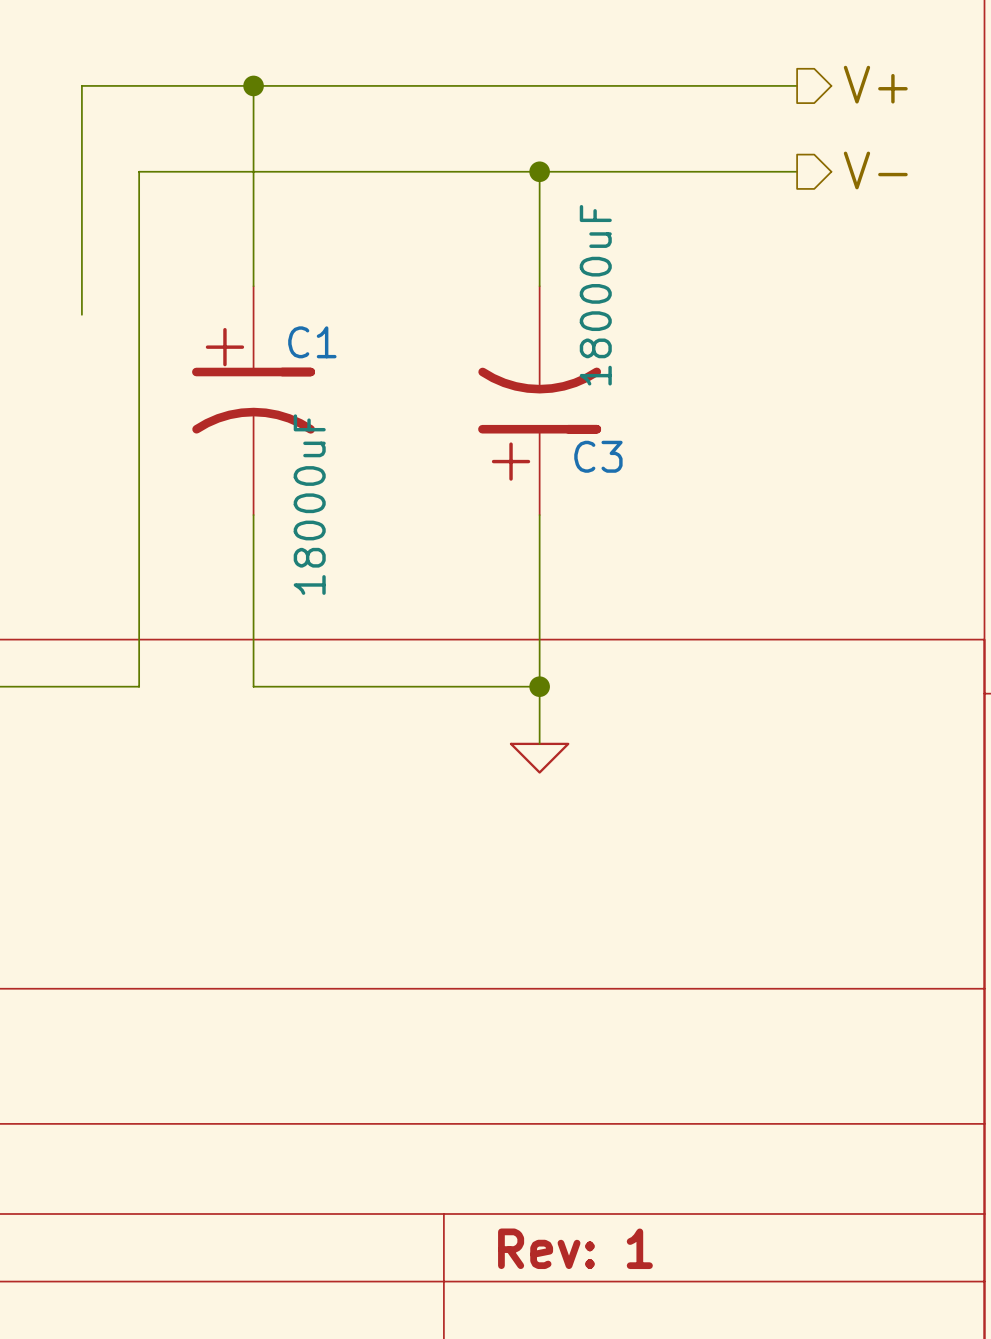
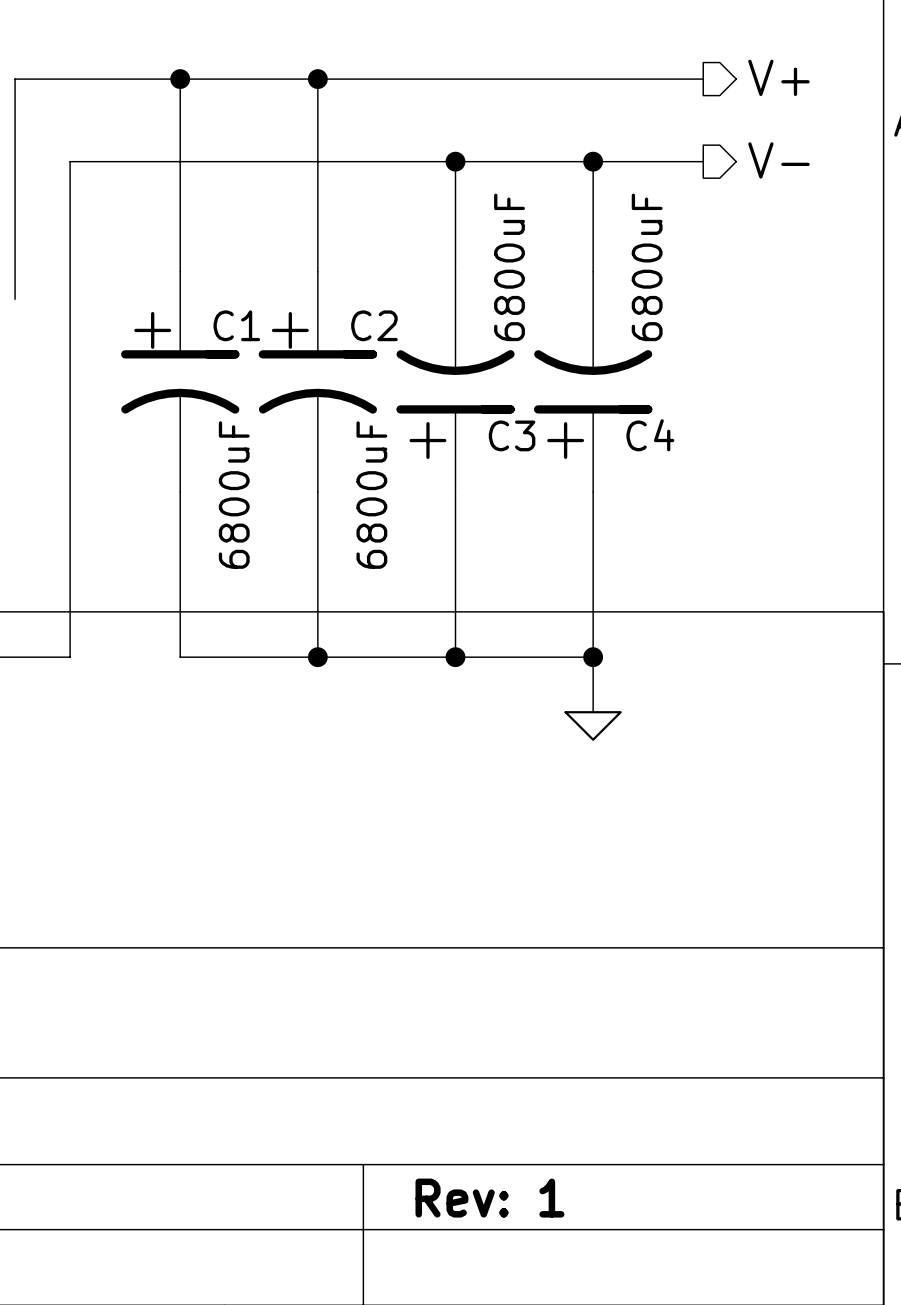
wire: none -> (317, 79) (317, 271)
junction: none -> (317, 79)
wire: none -> (593, 161) (593, 271)
junction: none -> (593, 161)
C3 value: 18000uF (595, 295) -> 6800uF (509, 267)
C2: none -> 6800uF (317, 381)
C4: none -> 6800uF (593, 381)
C1 value: 18000uF (309, 504) -> 6800uF (234, 495)
wire: none -> (317, 492) (317, 657)
wire: none -> (593, 492) (593, 712)
junction: none -> (317, 657)
wire: (539, 686) (539, 743) -> (455, 657) (593, 657)
junction: none -> (593, 657)
power symbol position: (539, 758) -> (593, 725)

